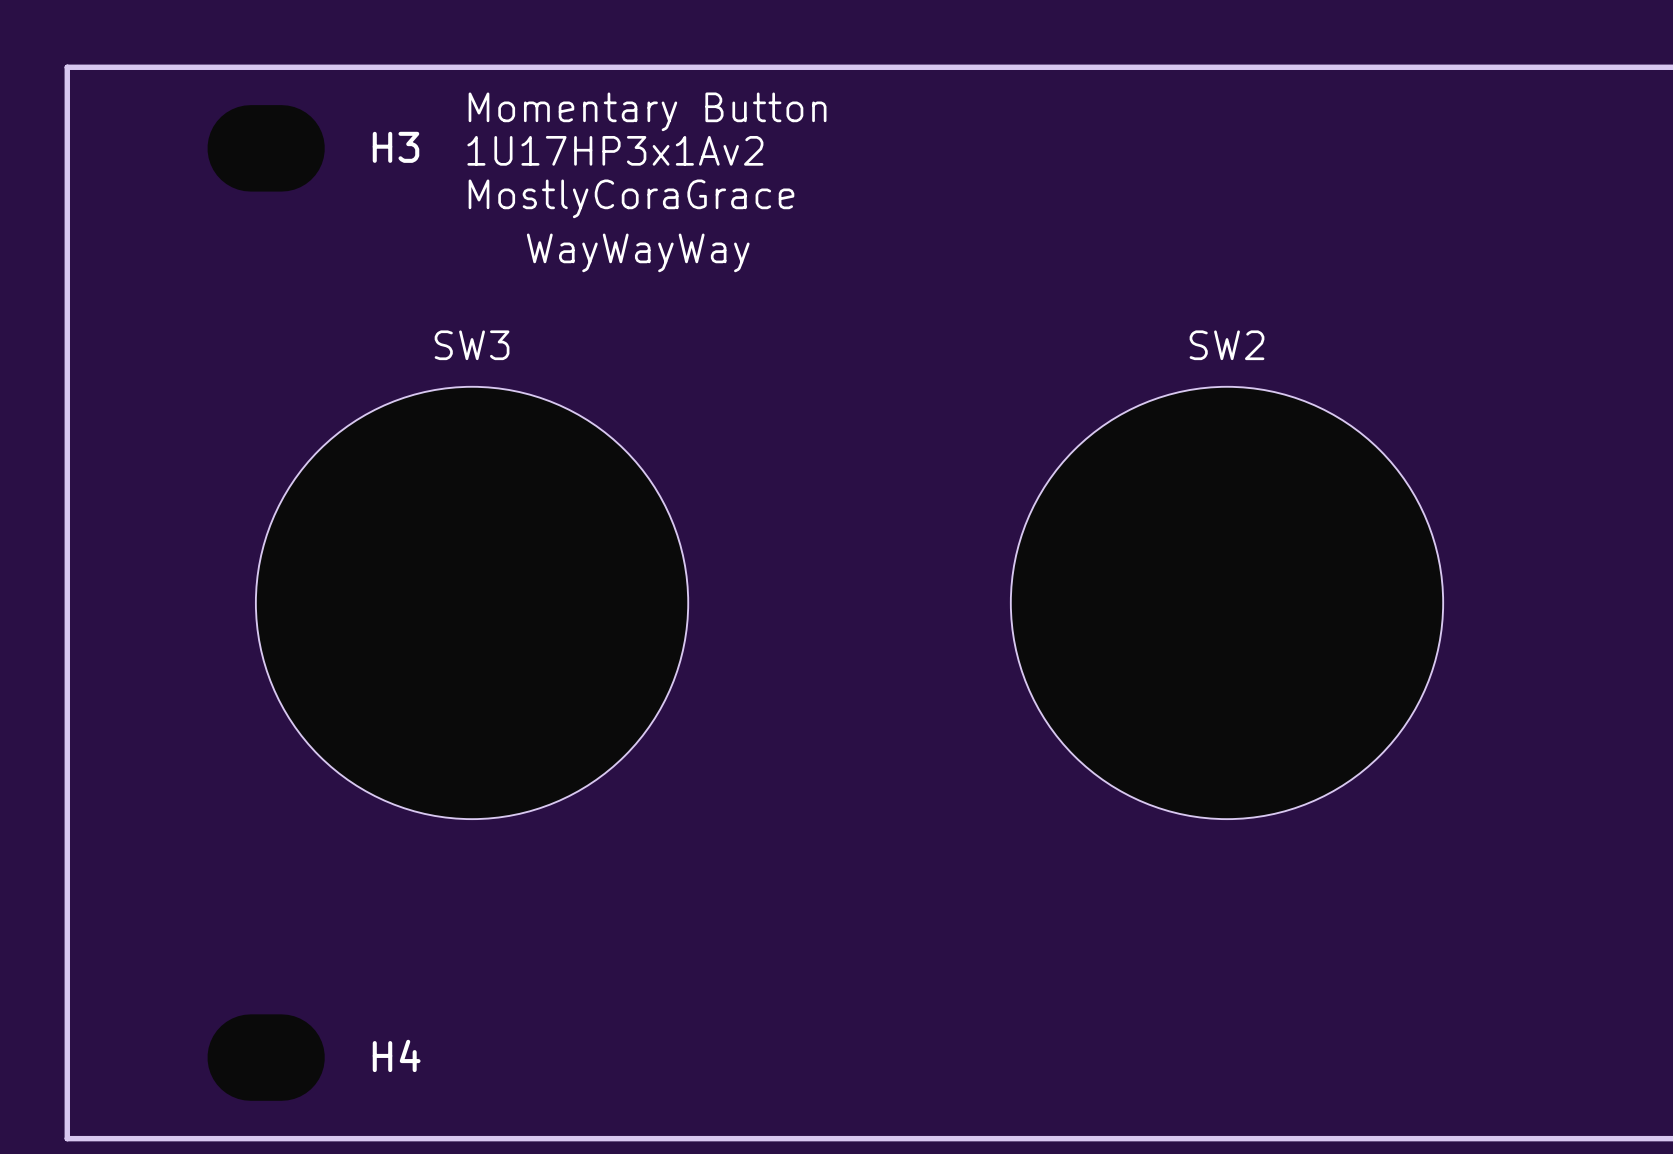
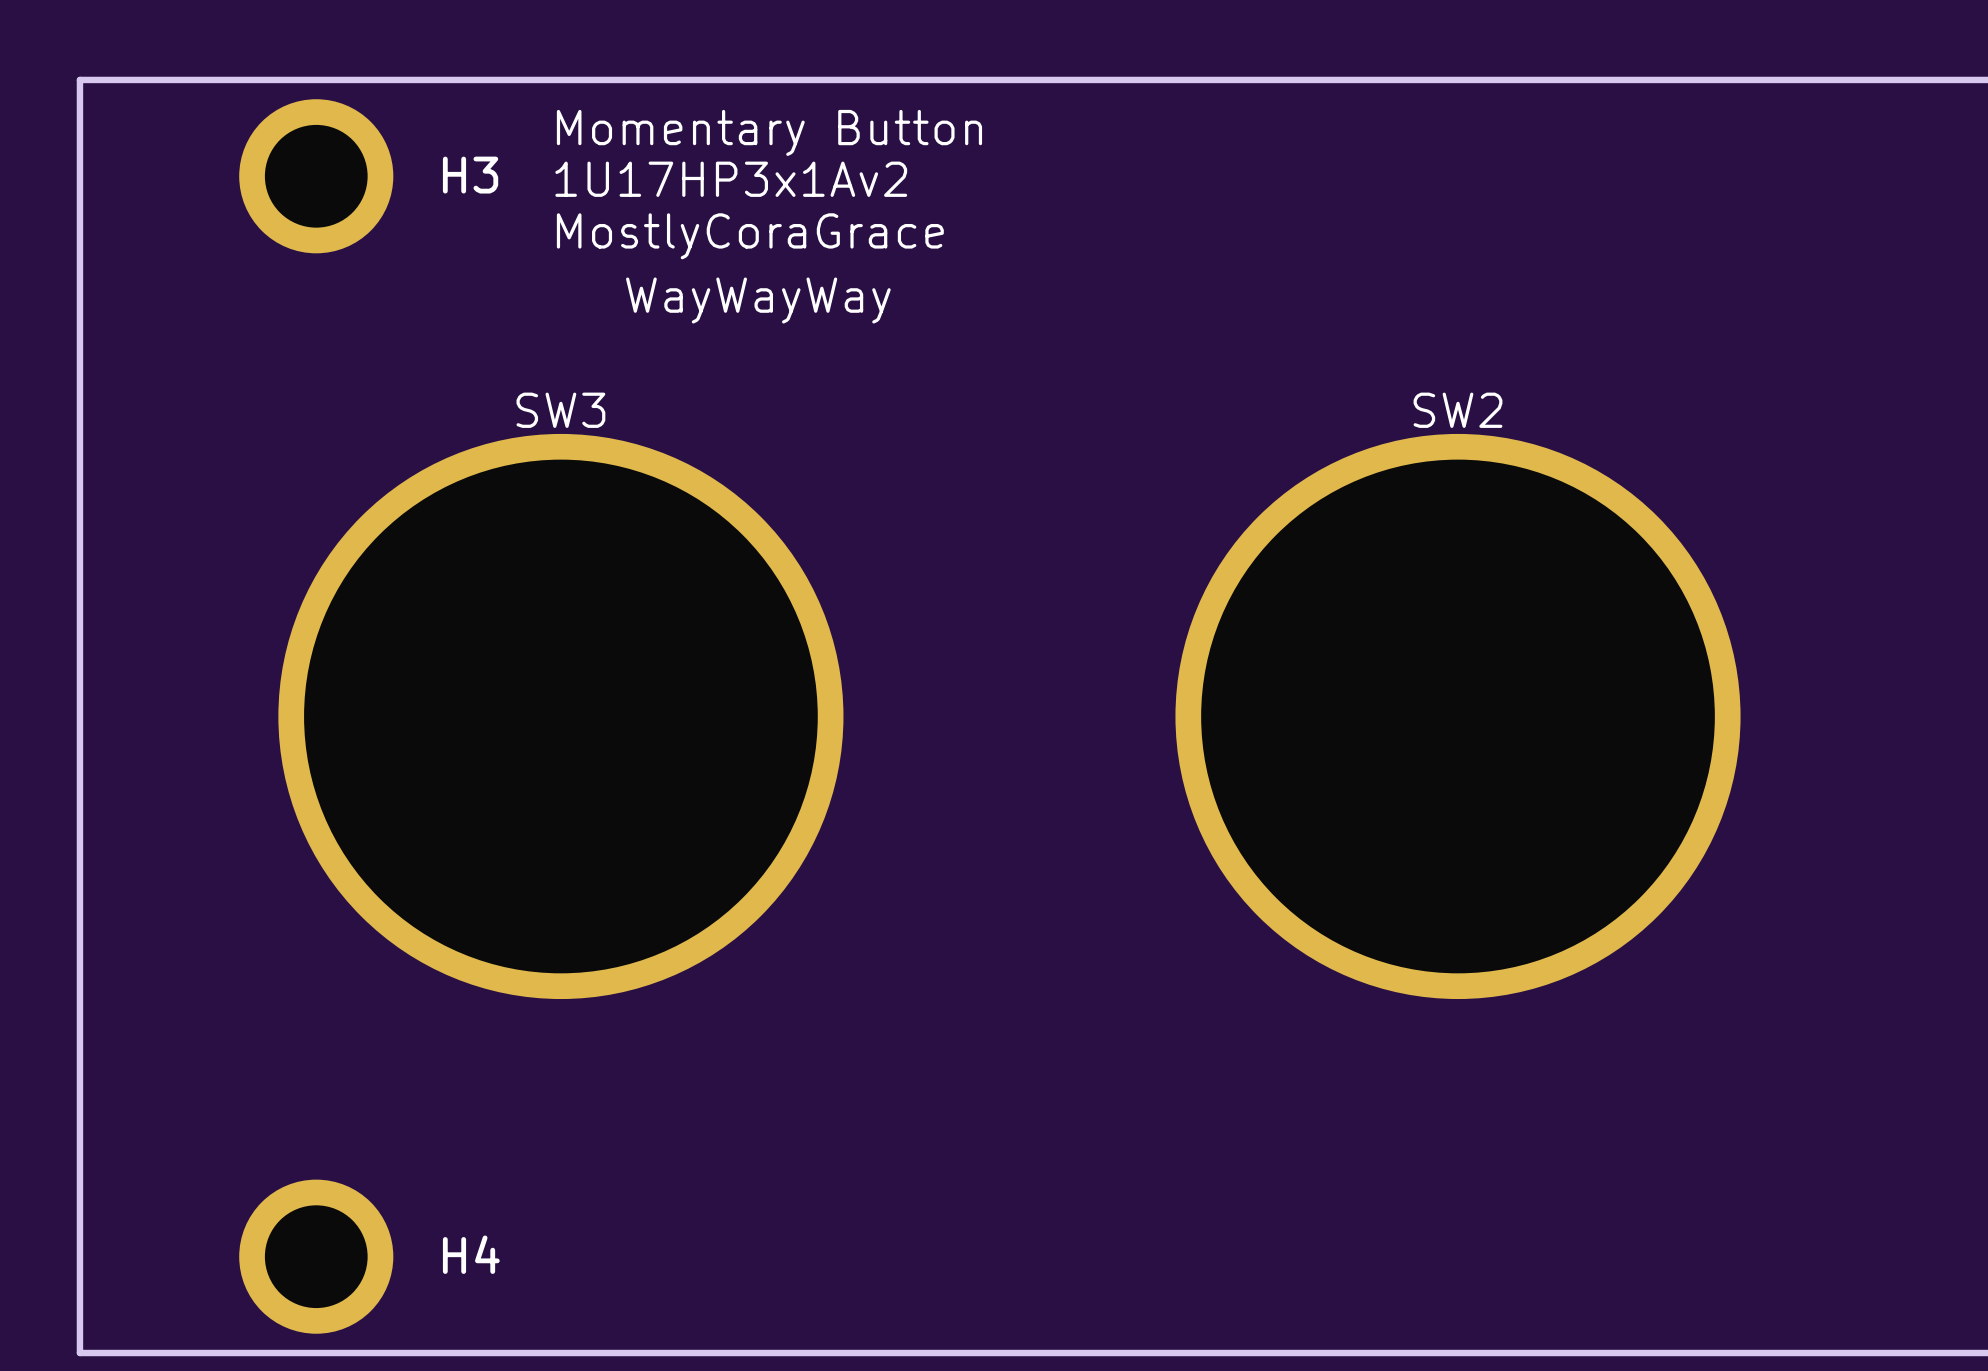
H3 footprint: [207, 105, 325, 192] -> [239, 99, 394, 254]
SW3 footprint: [255, 386, 689, 820] -> [278, 433, 844, 1000]
SW2 footprint: [1010, 386, 1444, 820] -> [1175, 433, 1741, 1000]
H4 footprint: [207, 1014, 325, 1101] -> [239, 1179, 394, 1334]

